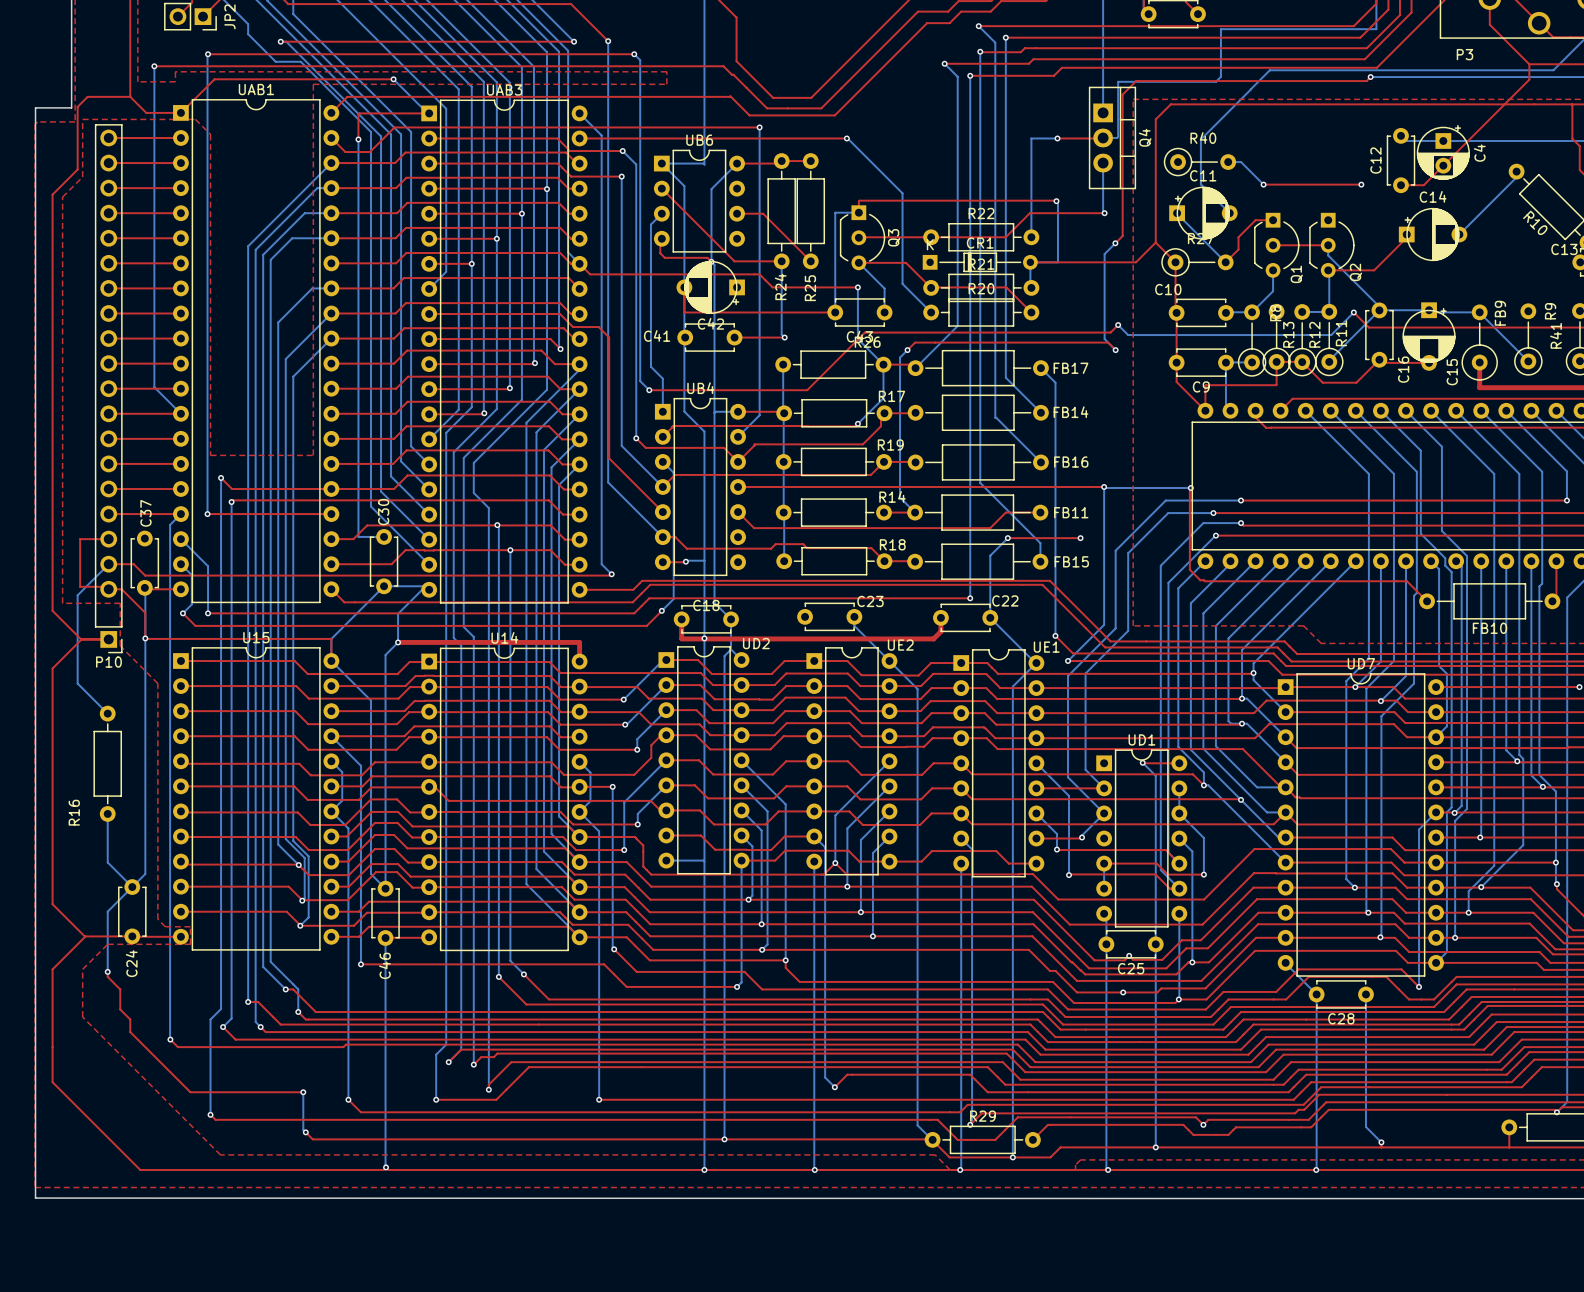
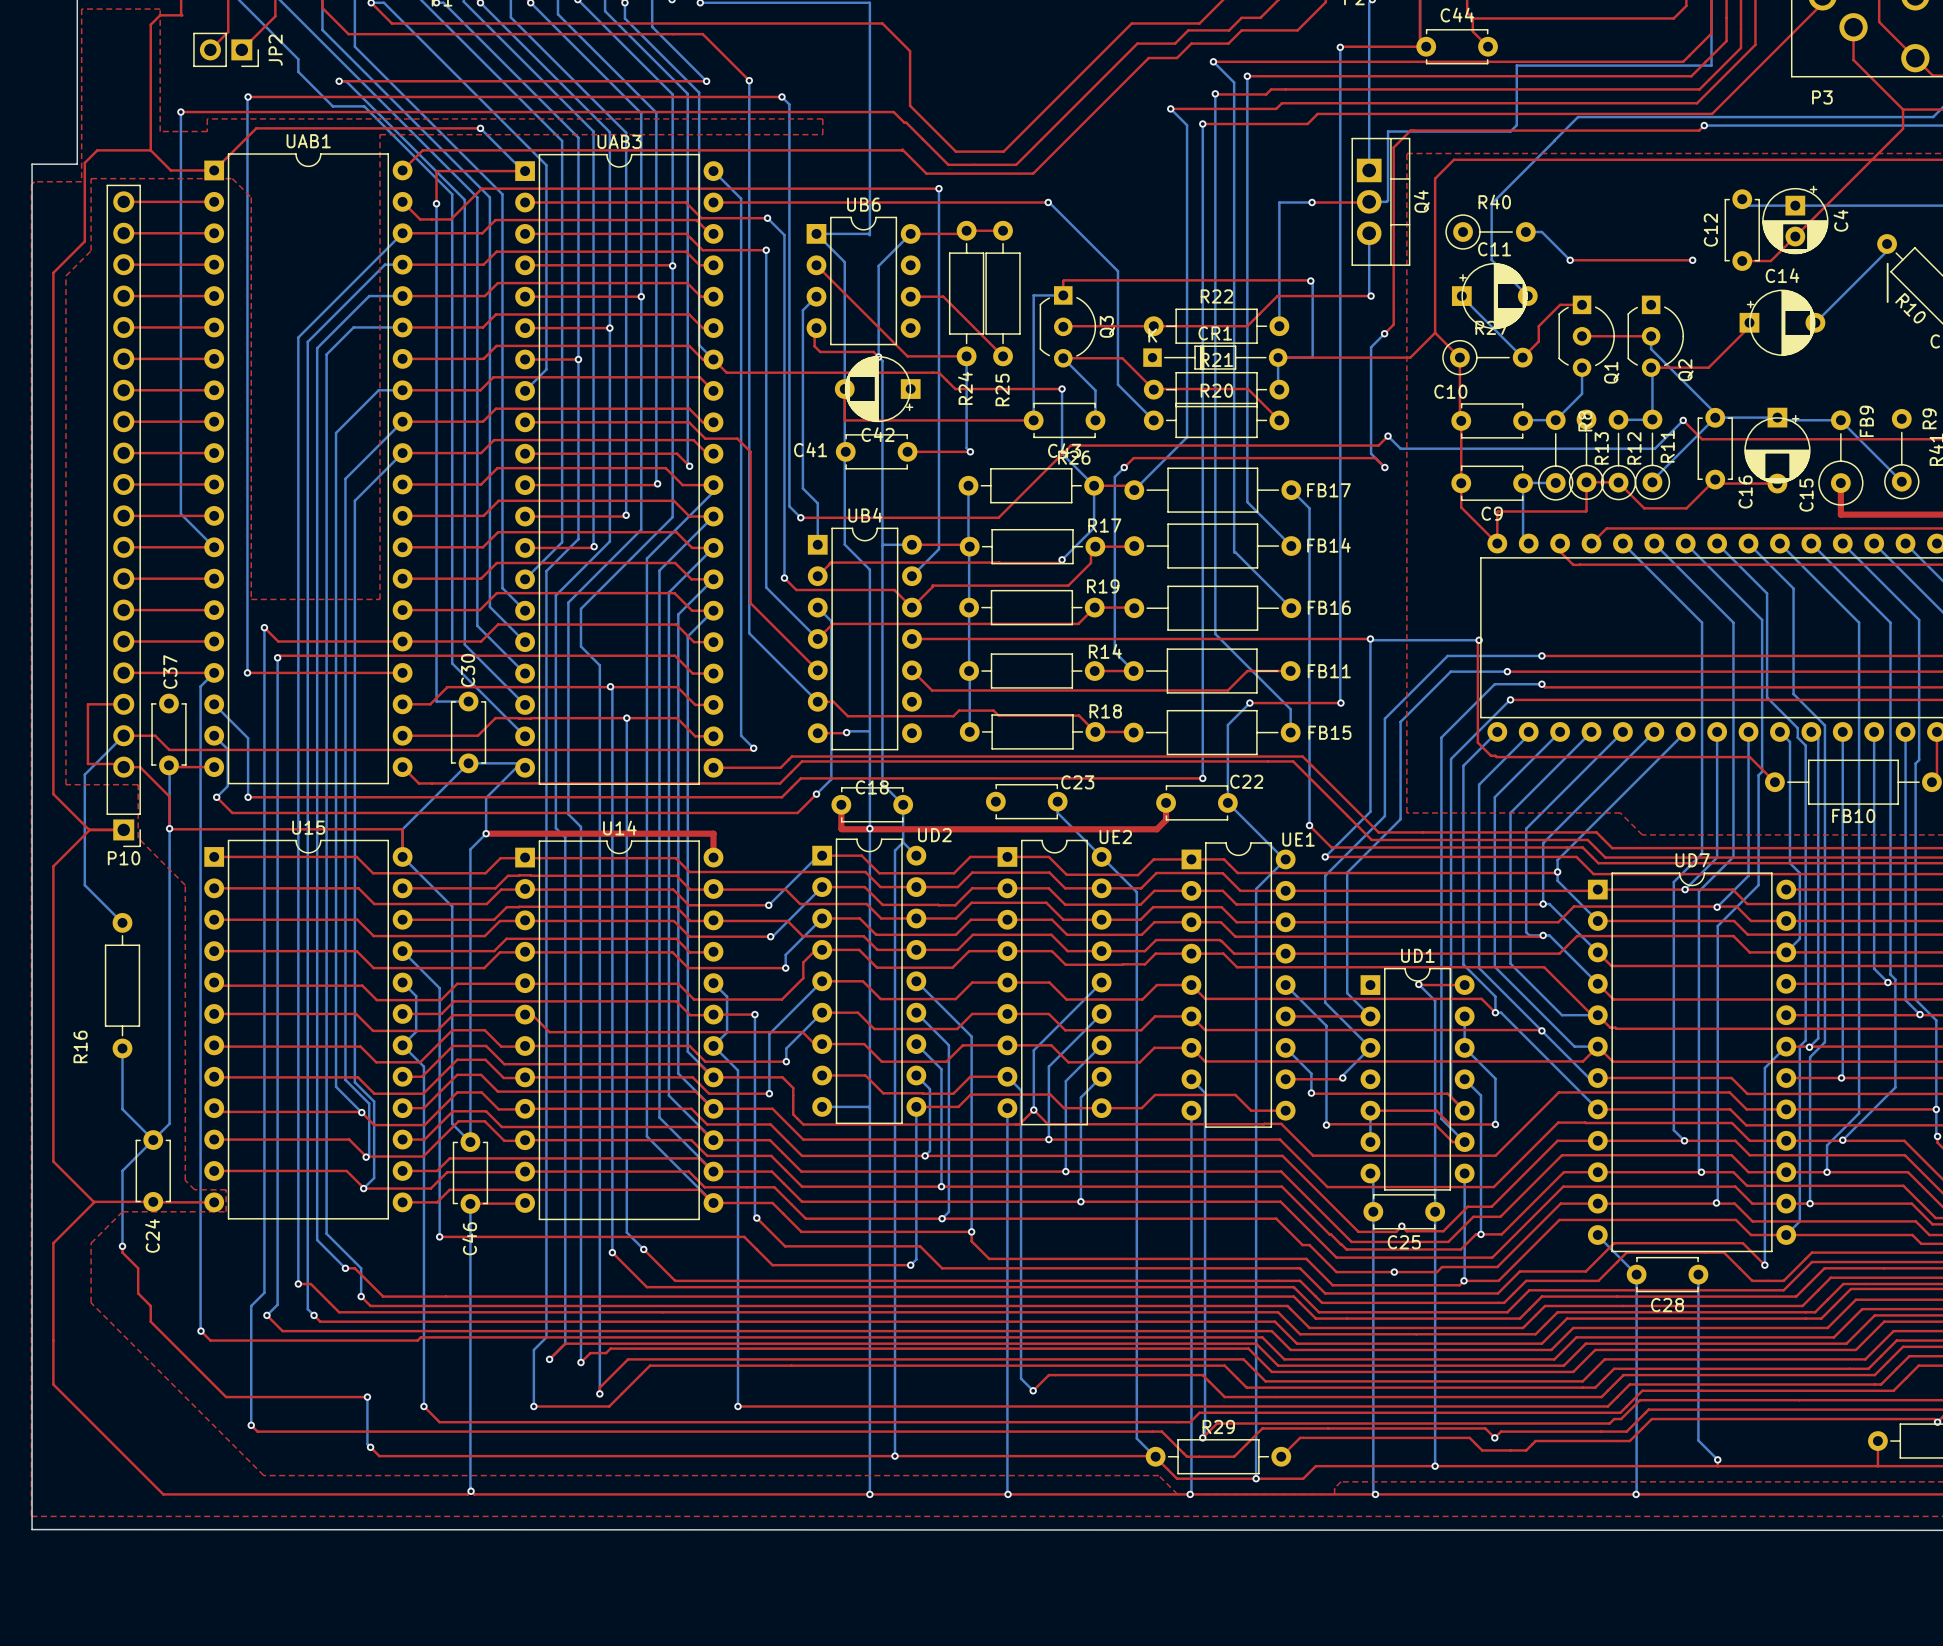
bottom track: none -> (1340, 47) (1340, 703)
via: none -> (1340, 47)
top track: none -> (1426, 46) (1340, 47)
line: none -> (1887, 263) (1887, 302)

